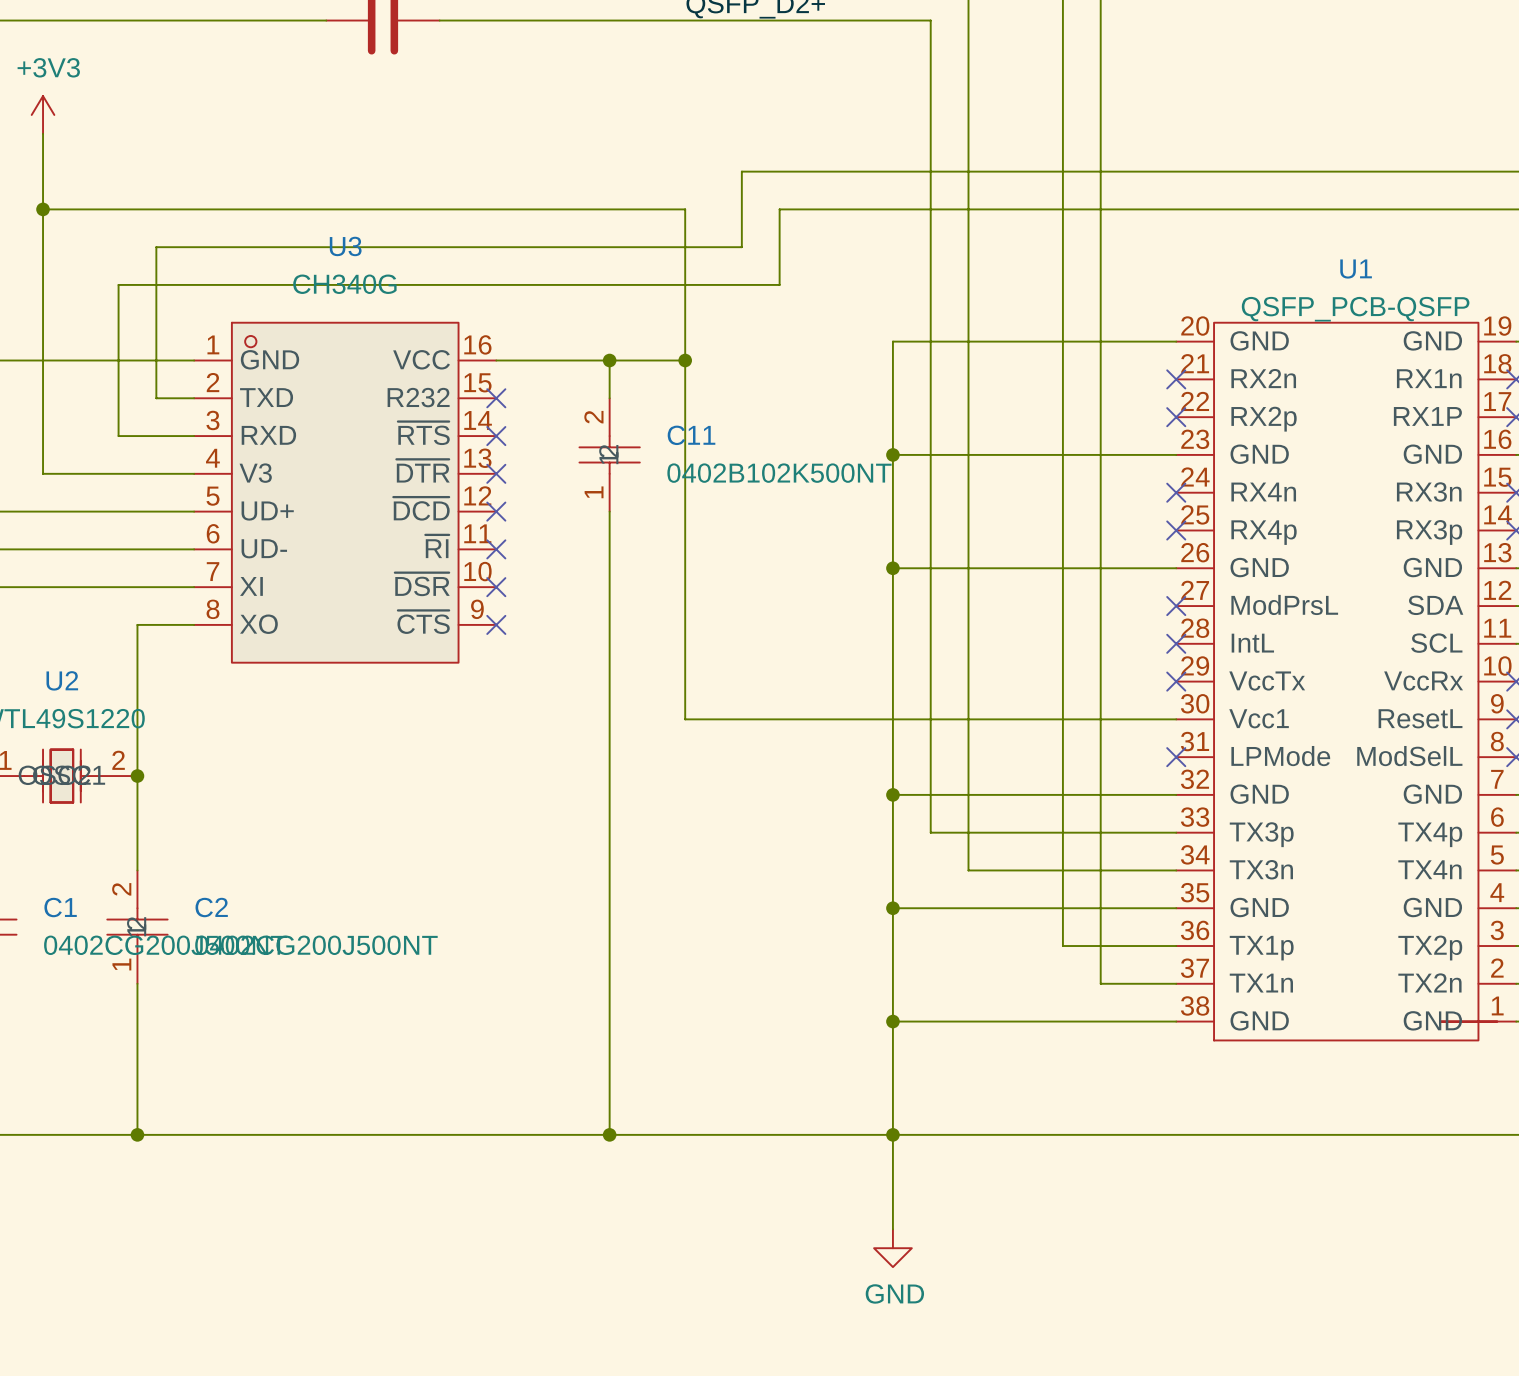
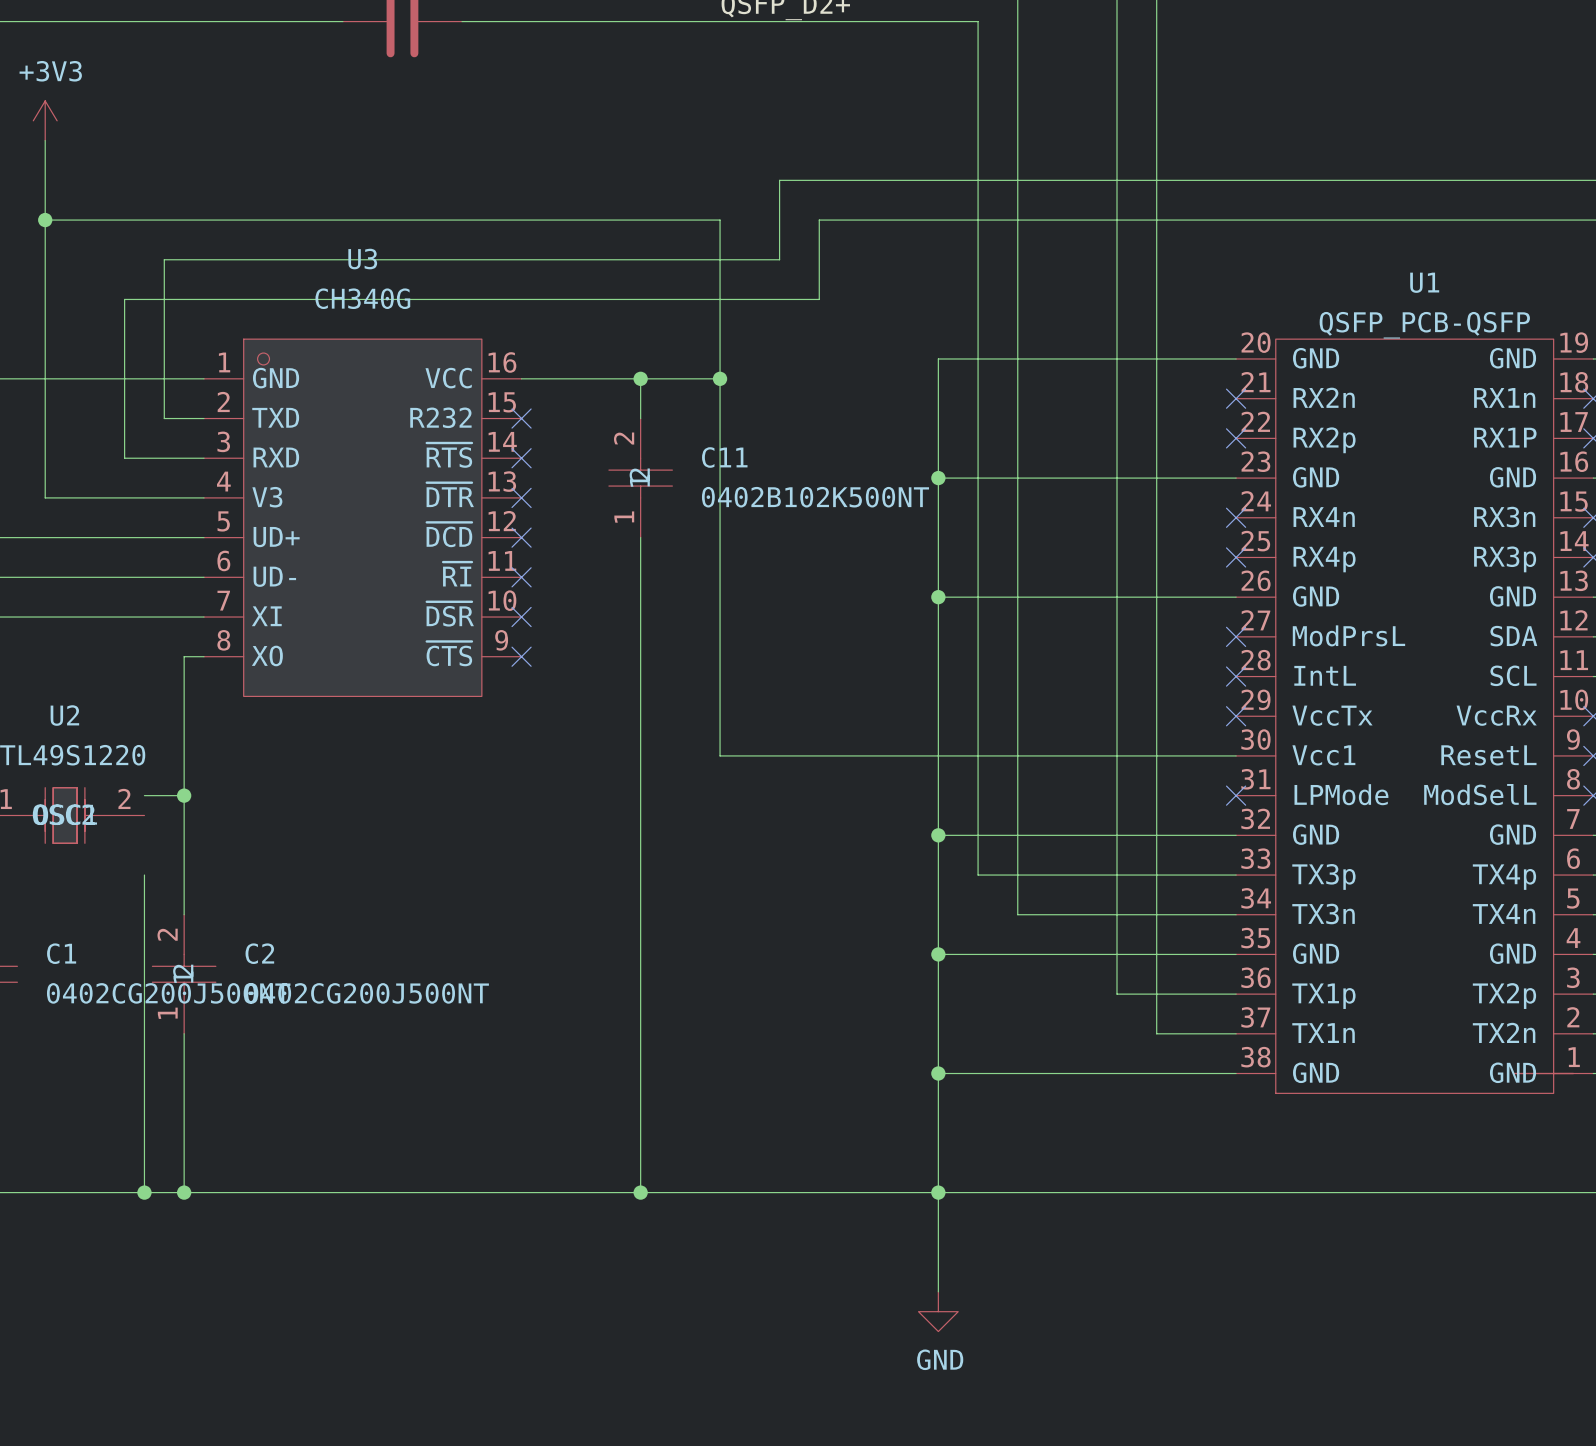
wire: (175, 624) (137, 624) (137, 832) -> (184, 656) (184, 914)
wire: none -> (144, 795) (184, 795)
junction position: (137, 776) -> (184, 795)
C2 position: (137, 927) -> (184, 974)
wire: none -> (184, 1033) (184, 1192)
junction: none -> (184, 1192)

